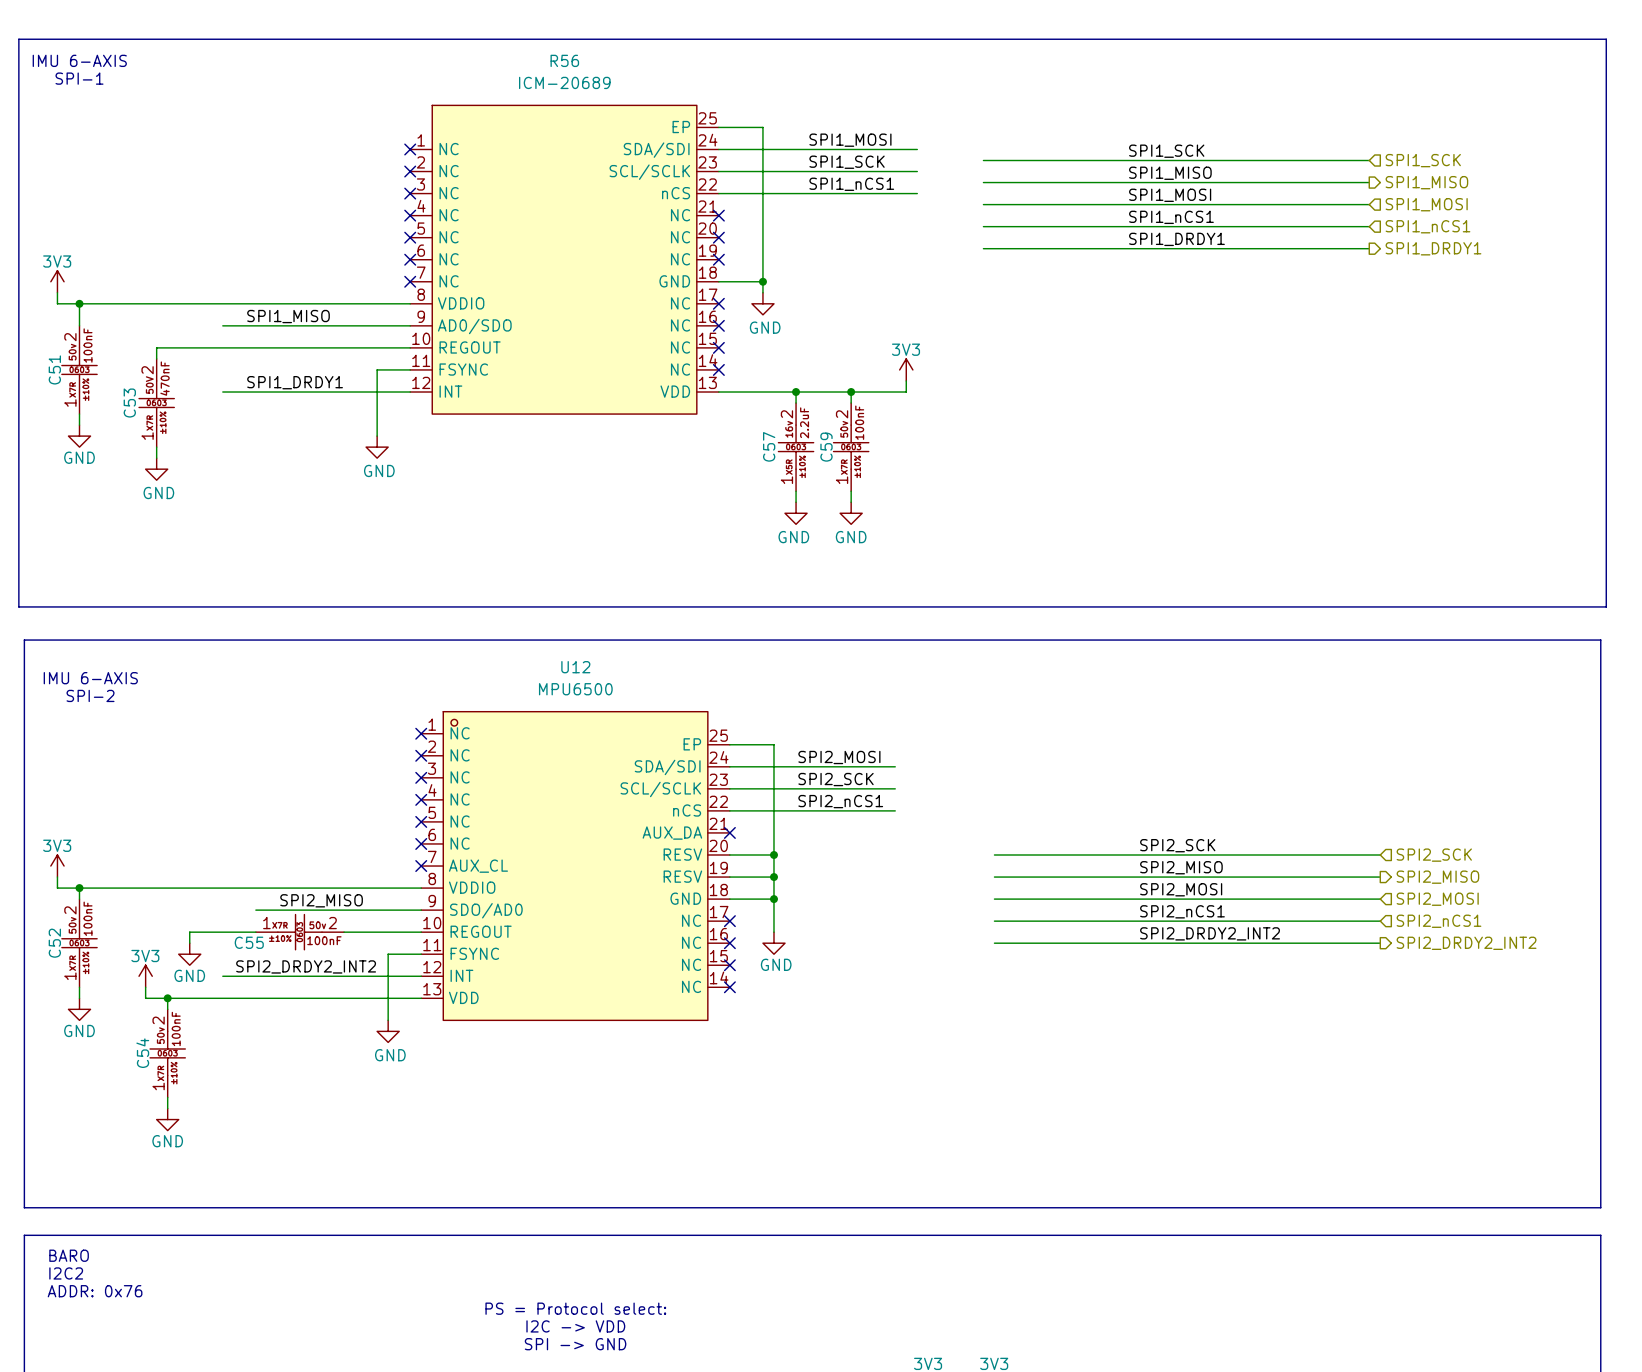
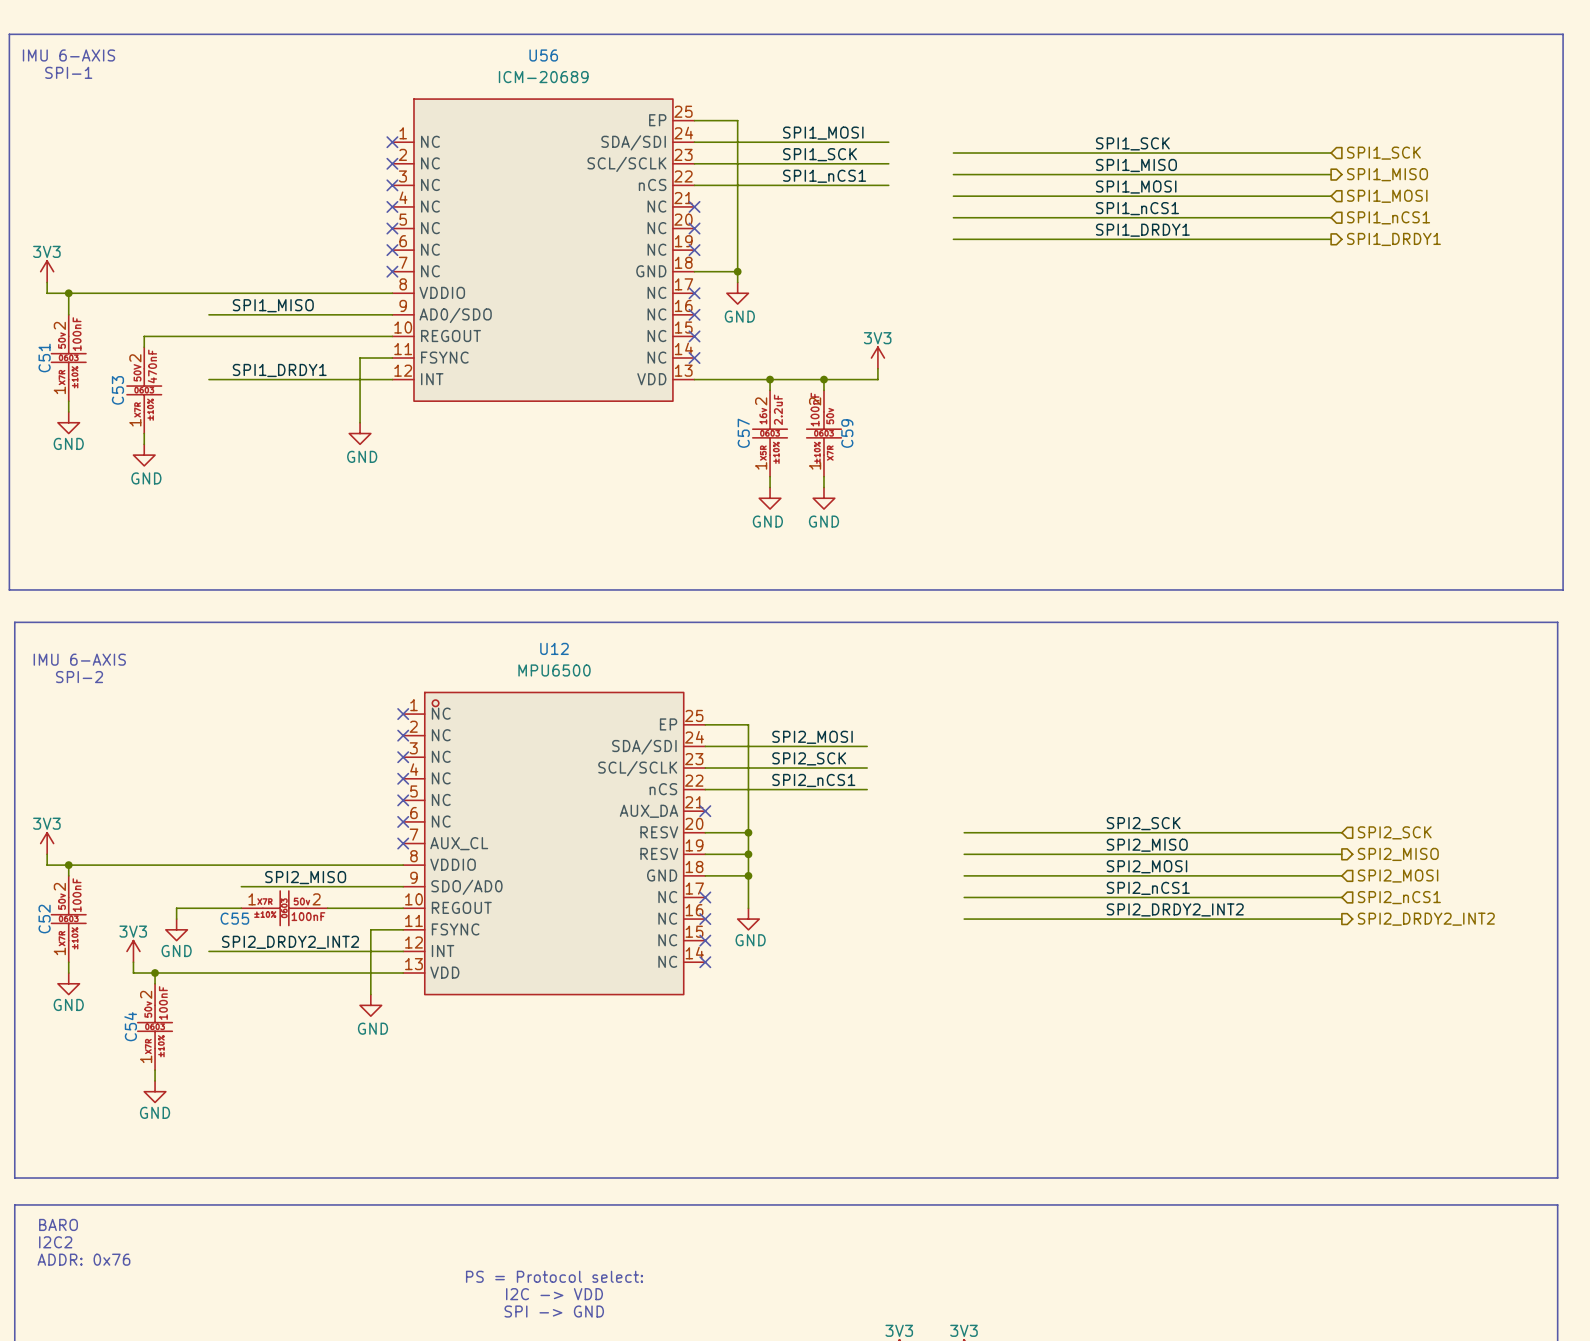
R56 name: R56 (564, 60) -> U56 (543, 55)
C59 flip: as is (851, 447) -> left-right (823, 433)

